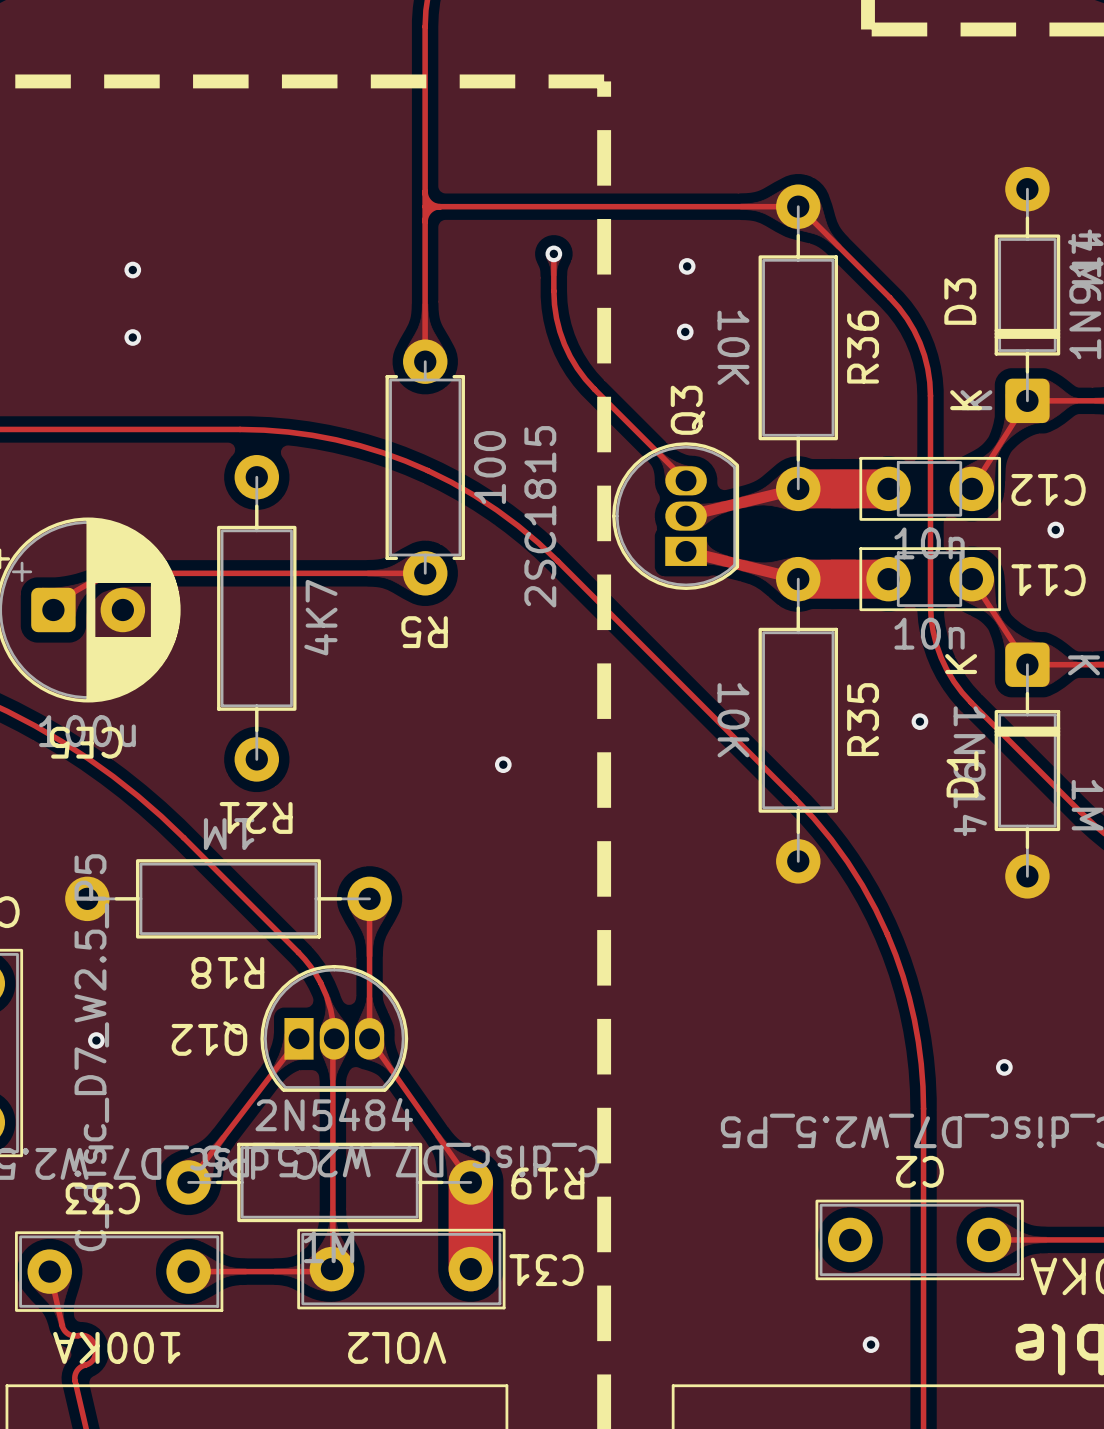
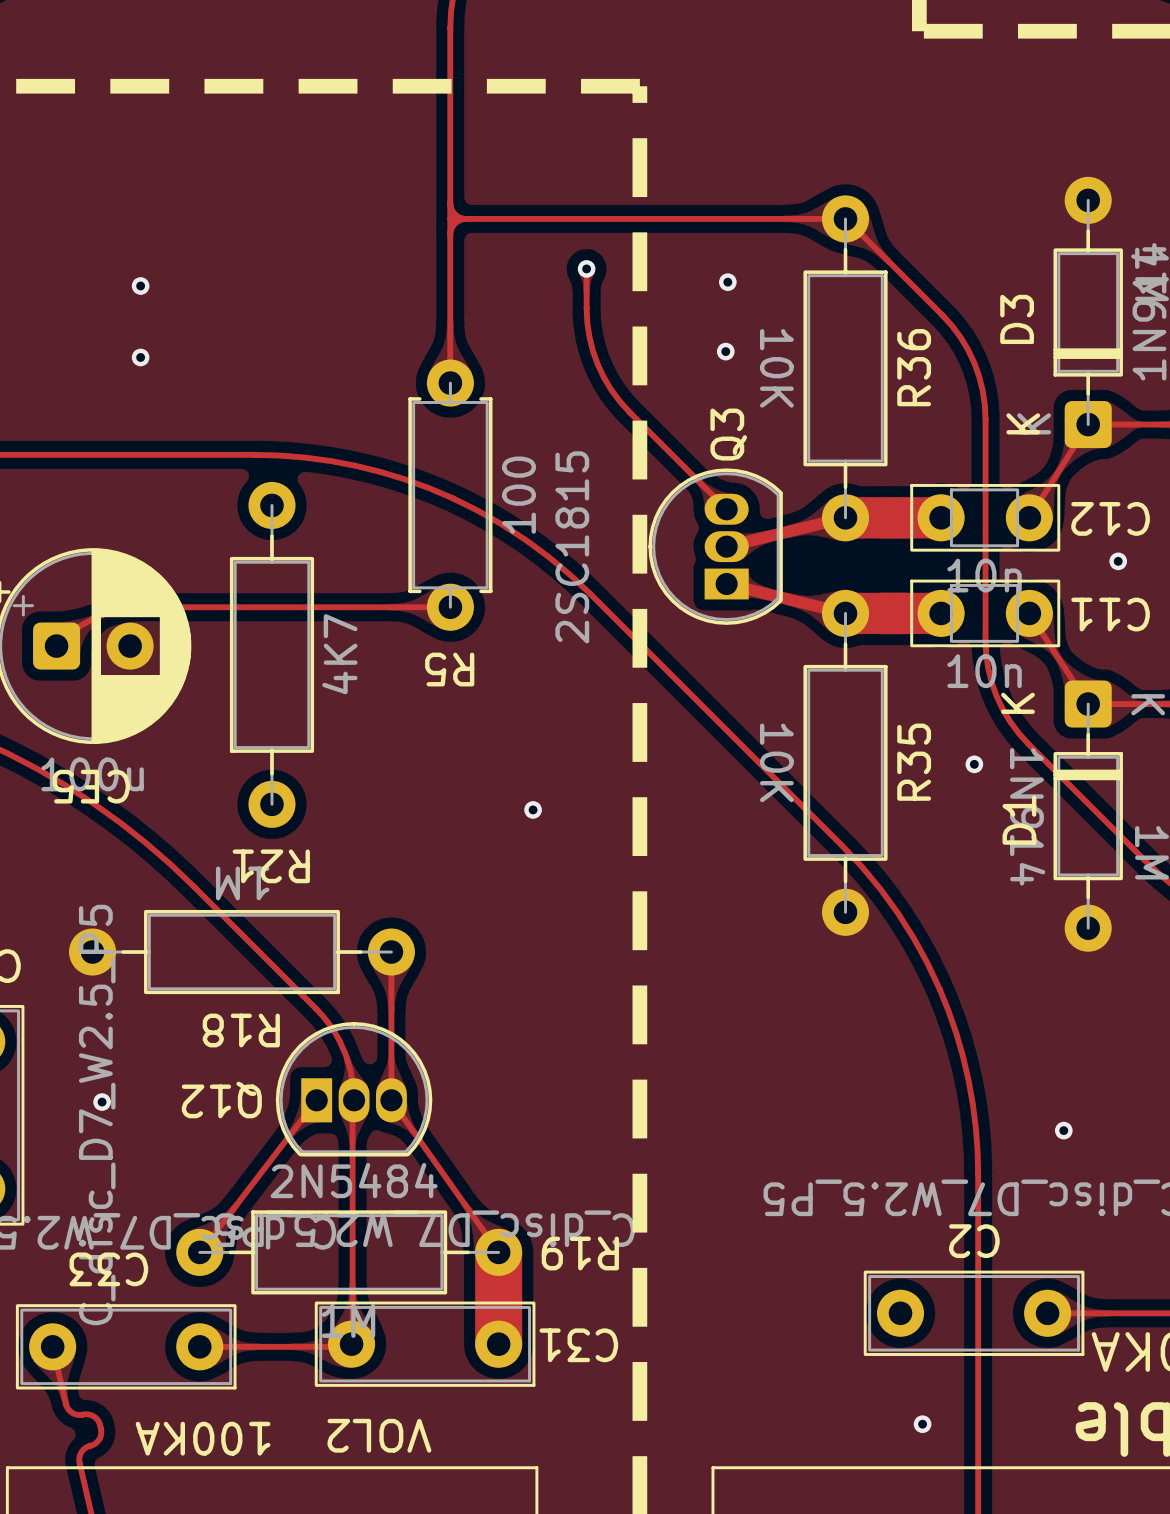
text position: 100KA (116, 1347) -> 100KA (203, 1438)
VOL2 name position: VOL2 (397, 1347) -> VOL2 (379, 1435)

